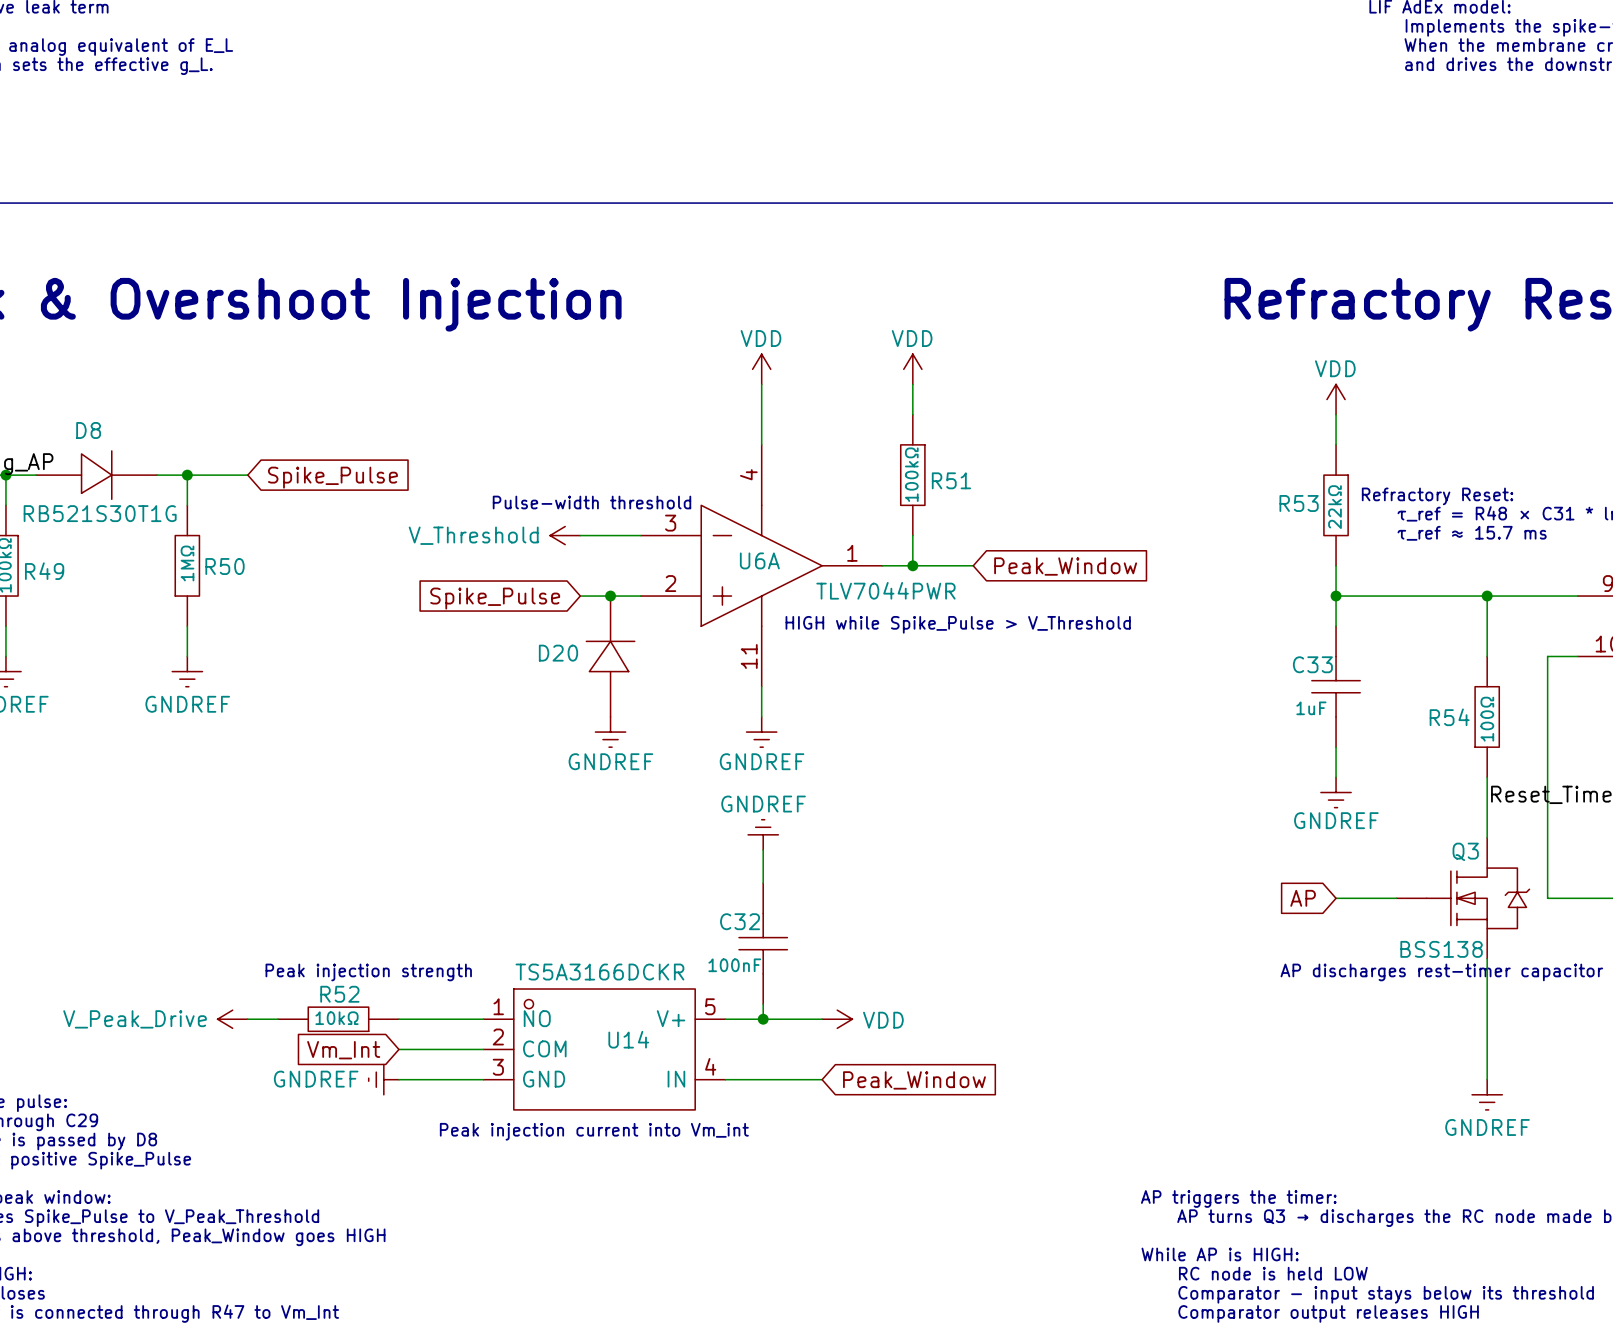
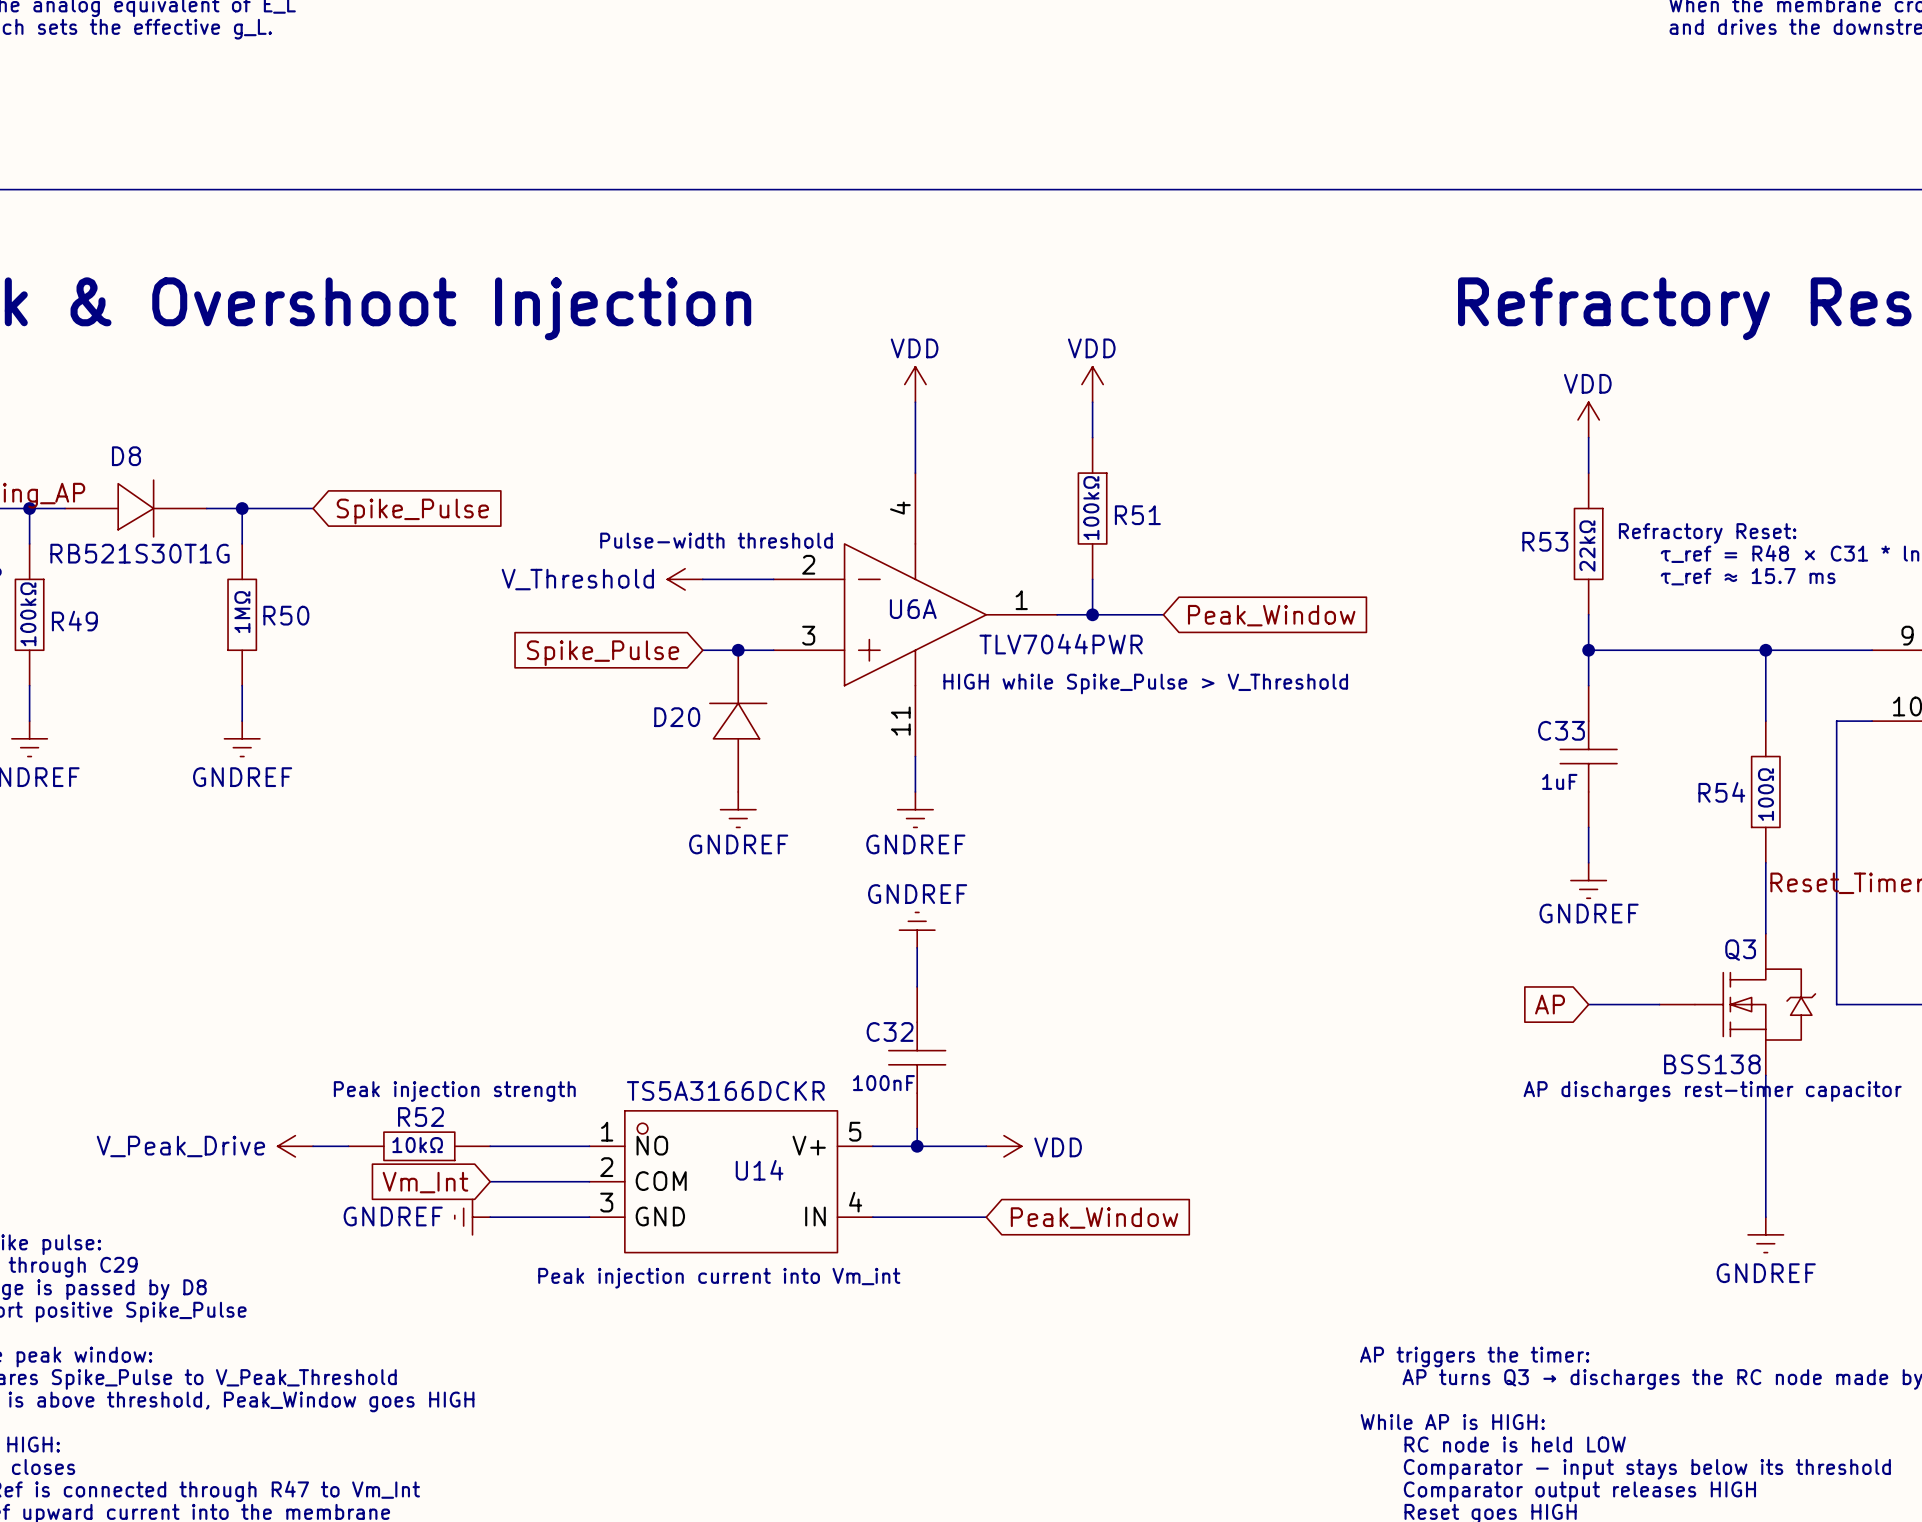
U6A pin number: 3 (670, 523) -> 2 (808, 564)
U6A pin number: 2 (670, 583) -> 3 (808, 635)

